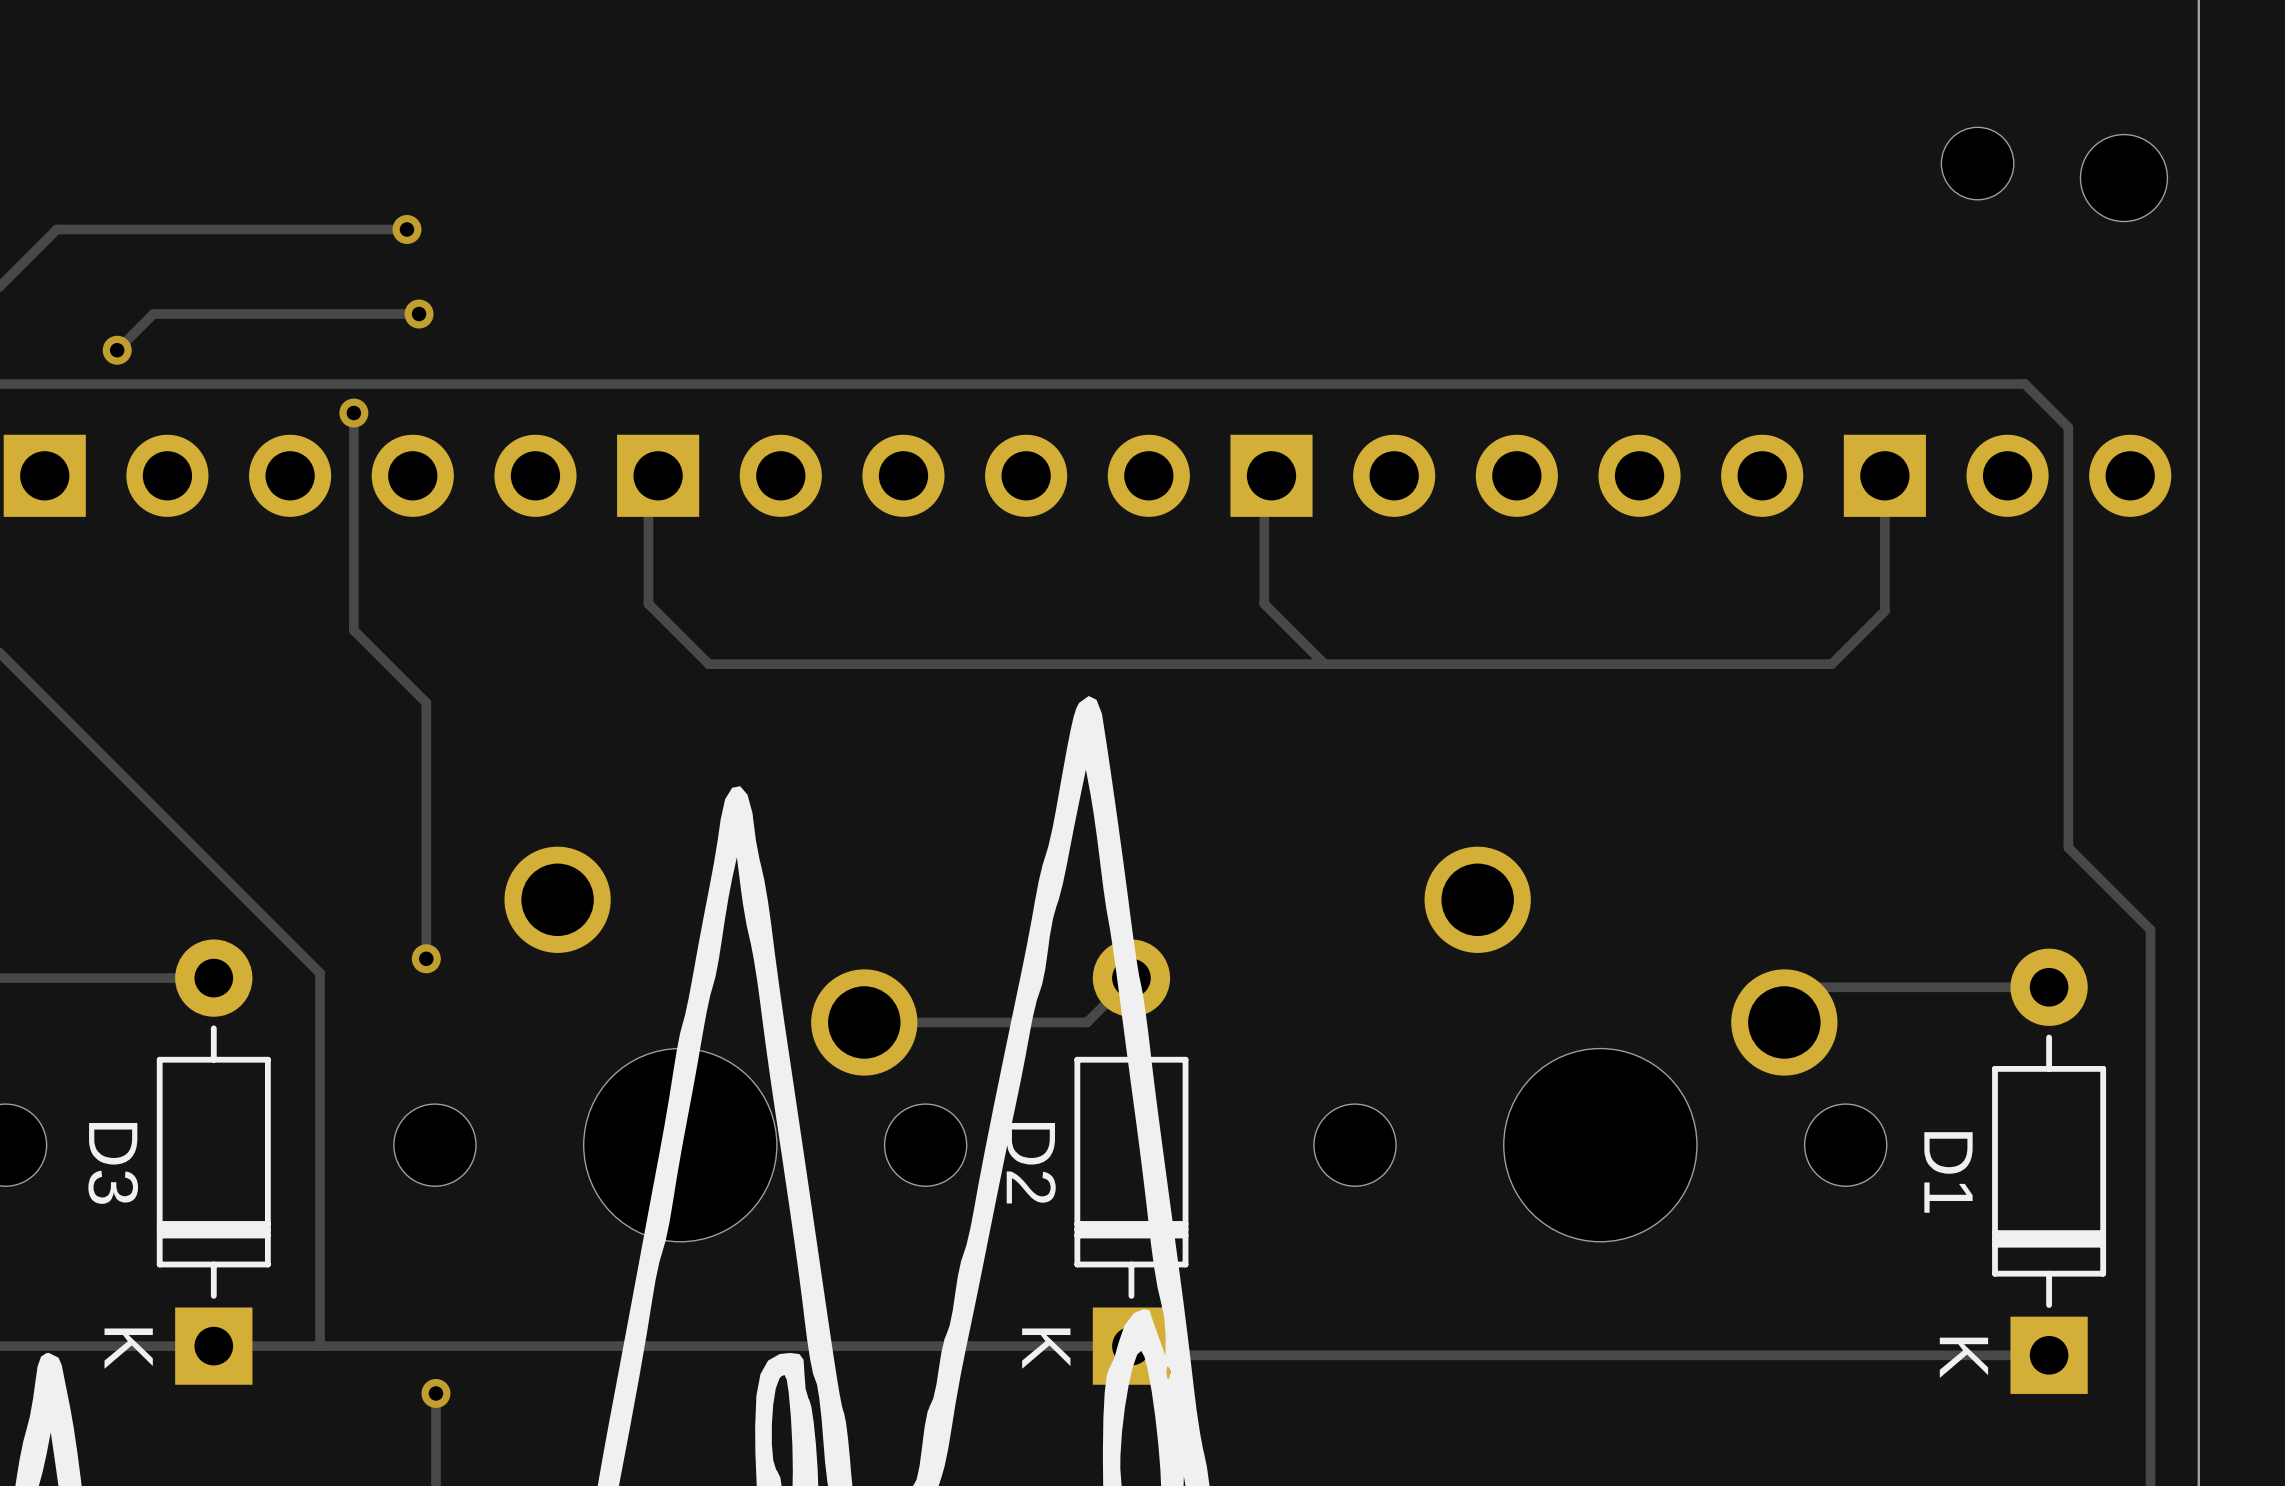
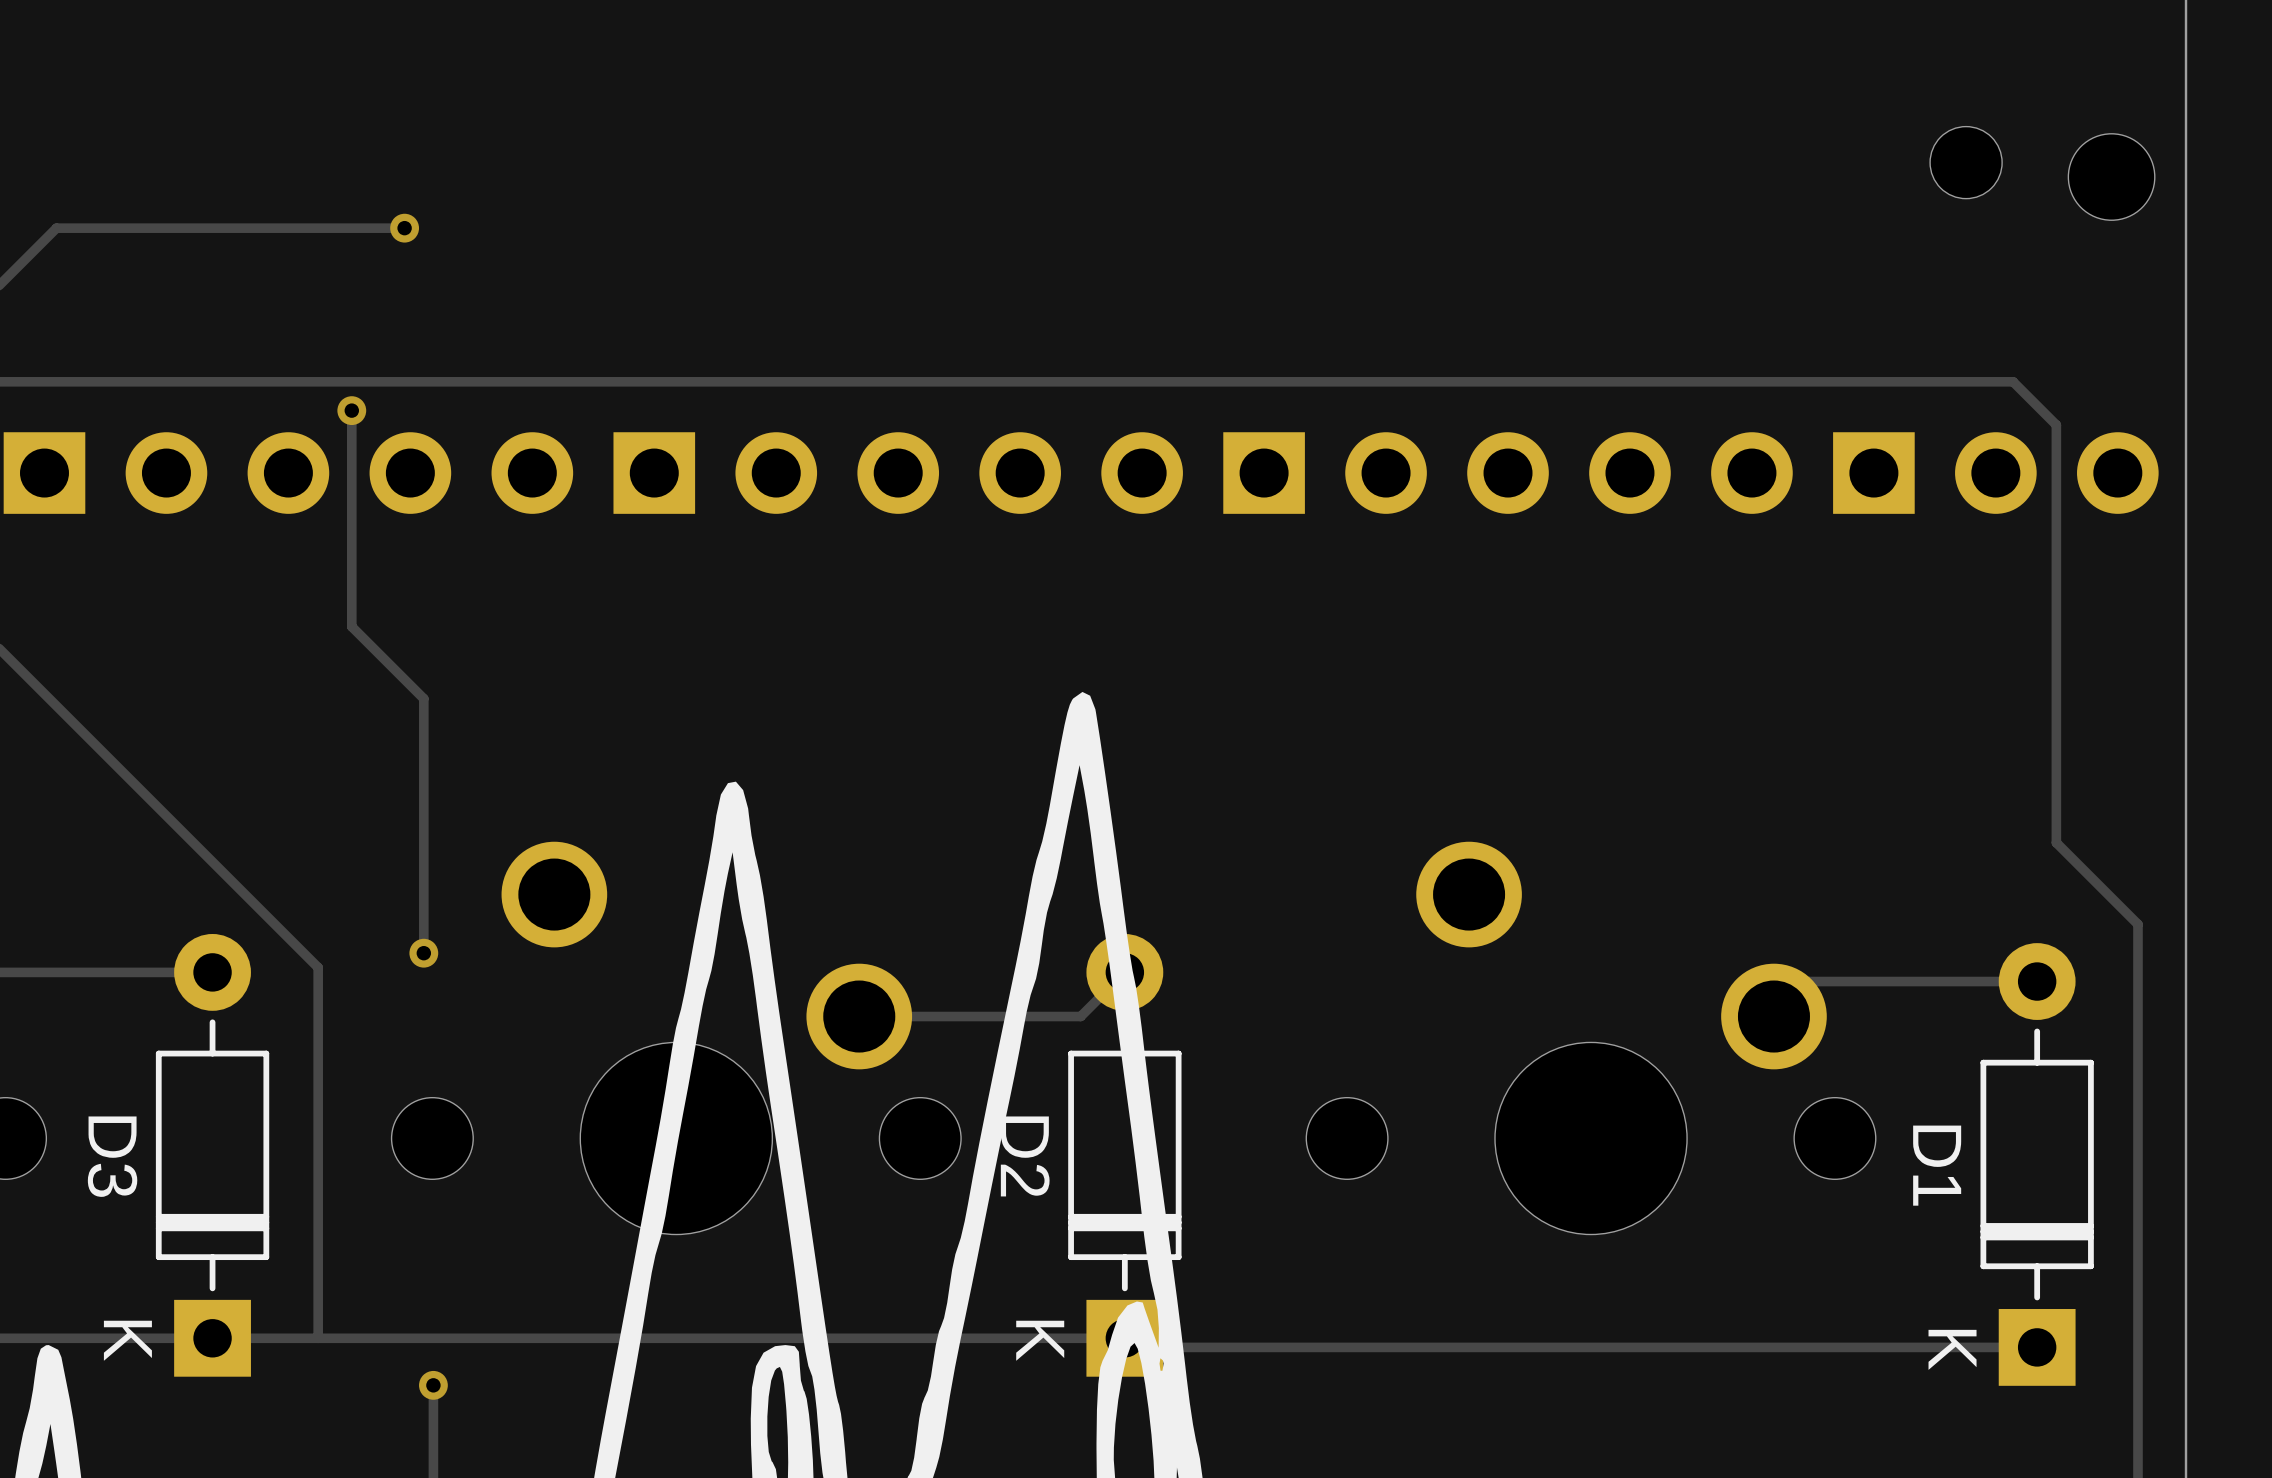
track: (419, 314) (153, 314) (117, 350) -> none
via: (419, 314) -> none
via: (117, 350) -> none
track: (1271, 475) (1264, 483) (1264, 603) (1324, 664) -> none
track: (1884, 475) (1884, 611) (1831, 664) (708, 664) (648, 603) (648, 485) (658, 475) -> none

